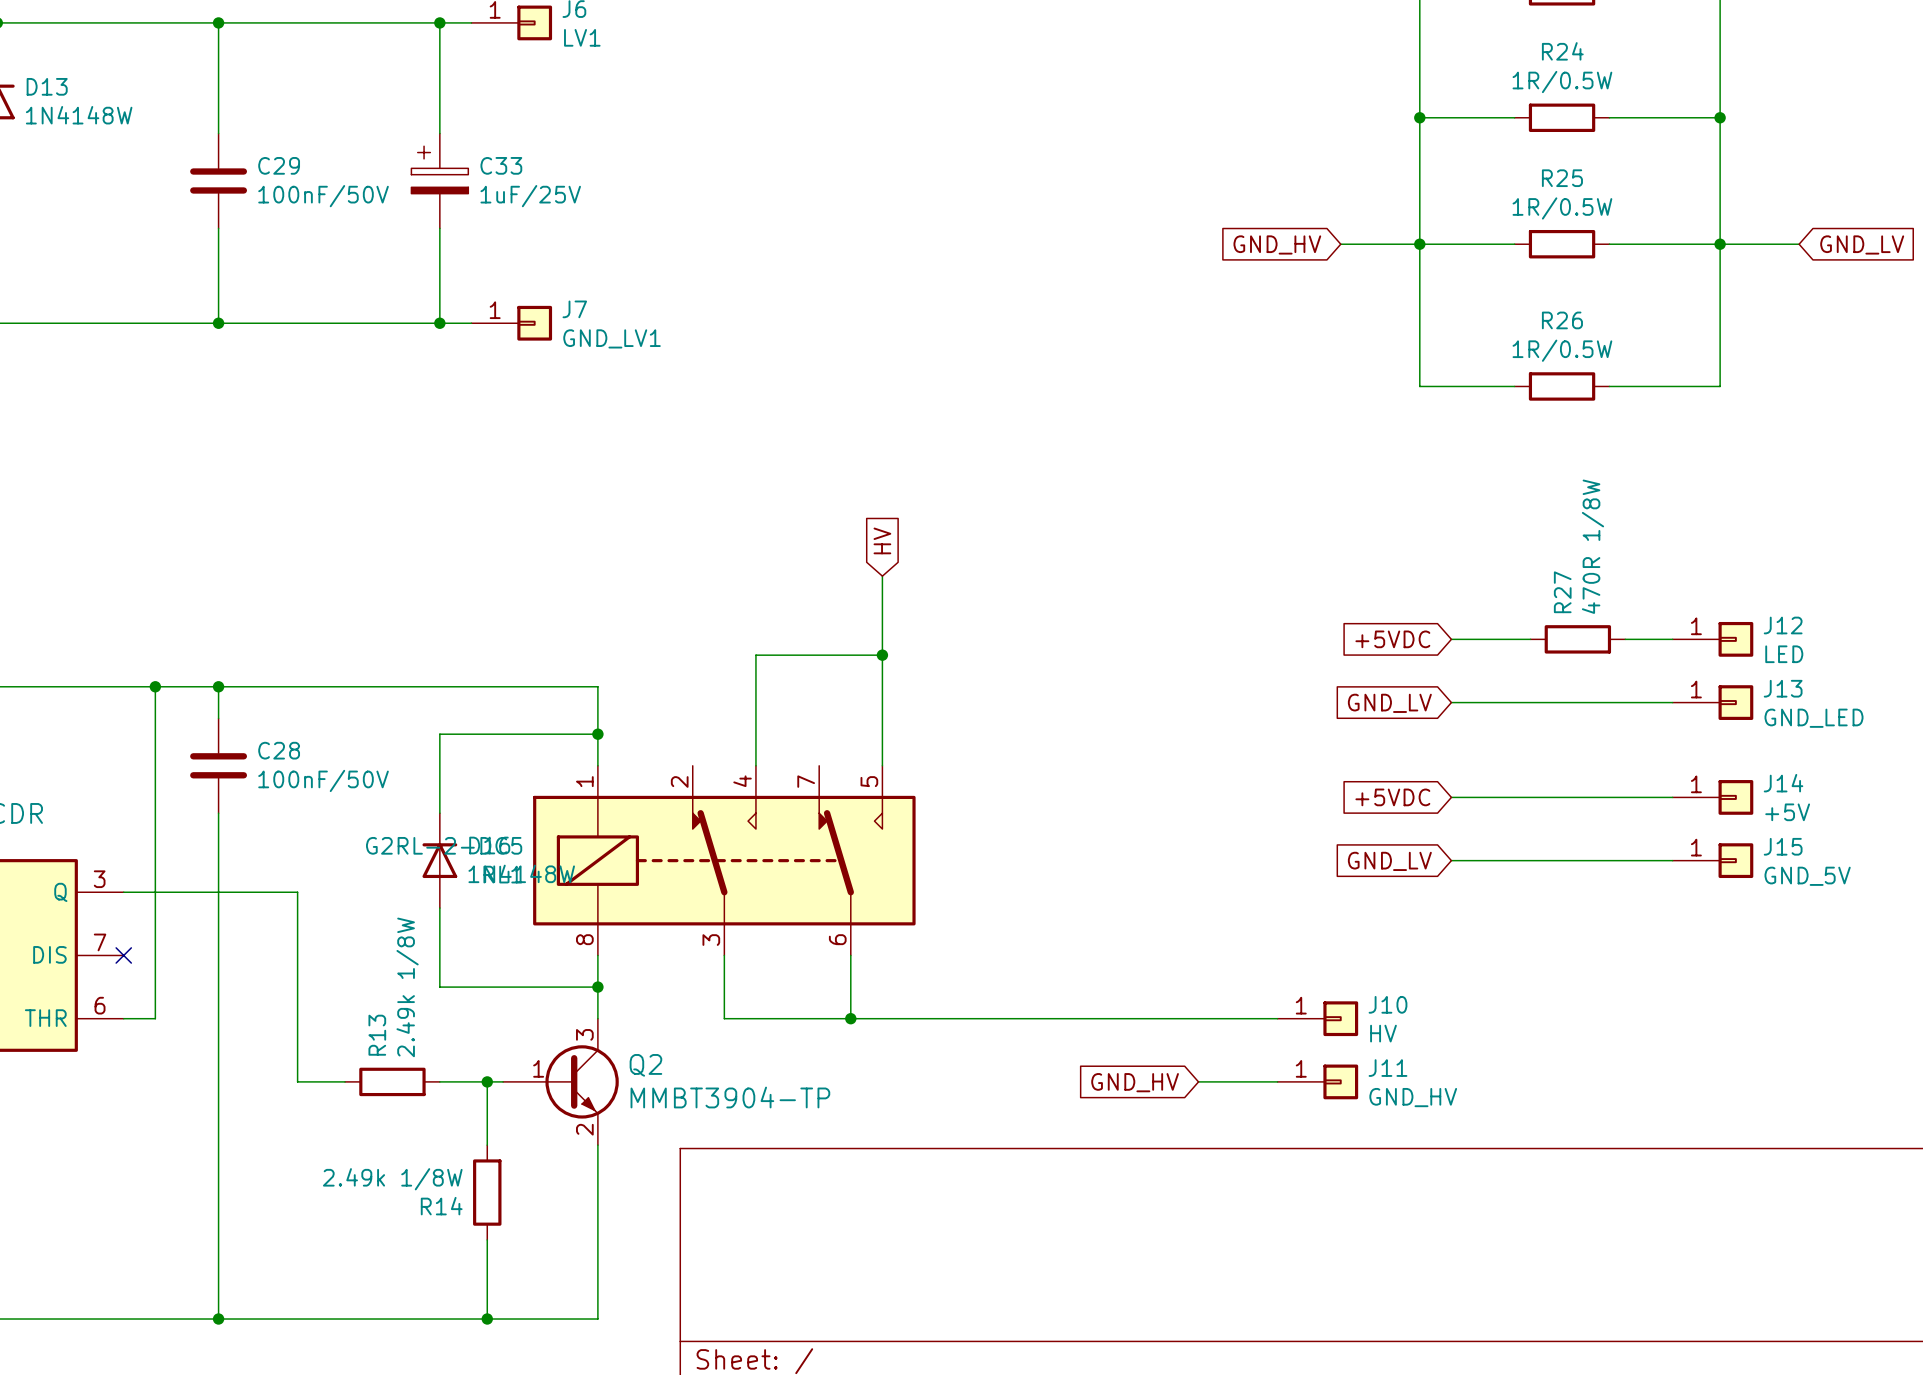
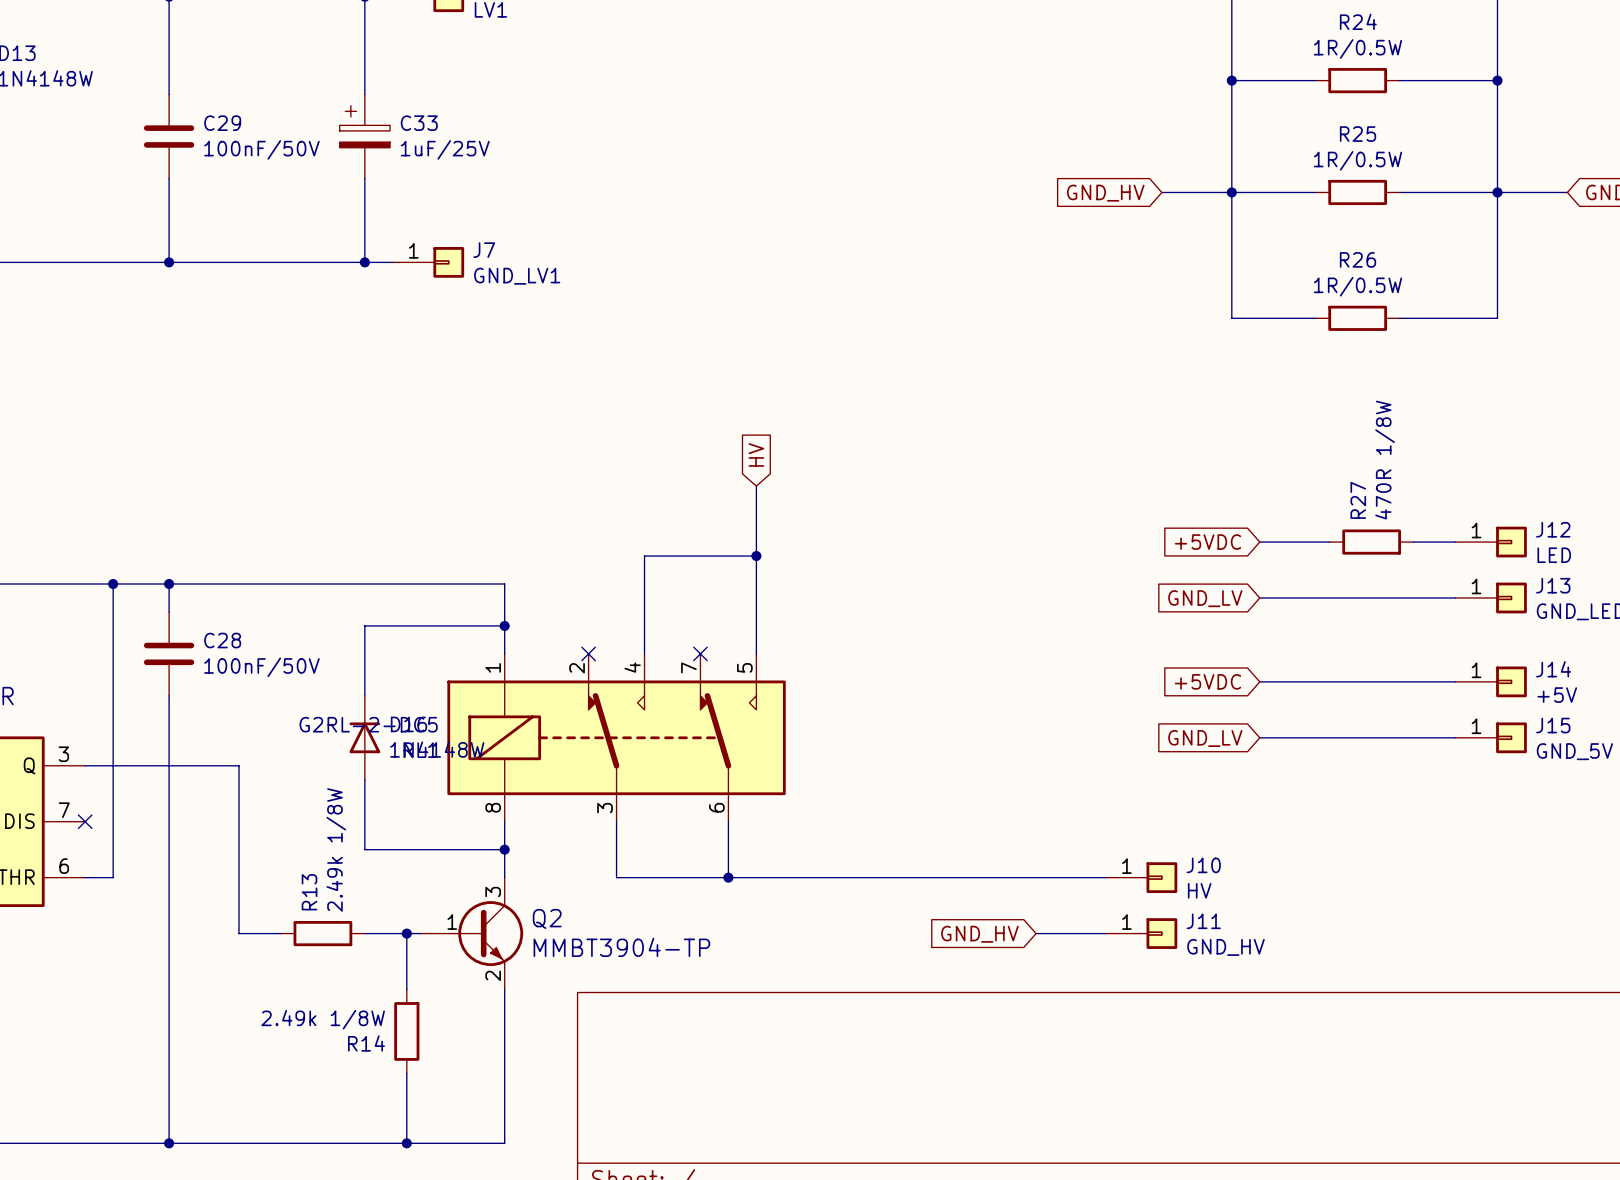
no-connect mark: none -> (588, 653)
no-connect mark: none -> (700, 653)

